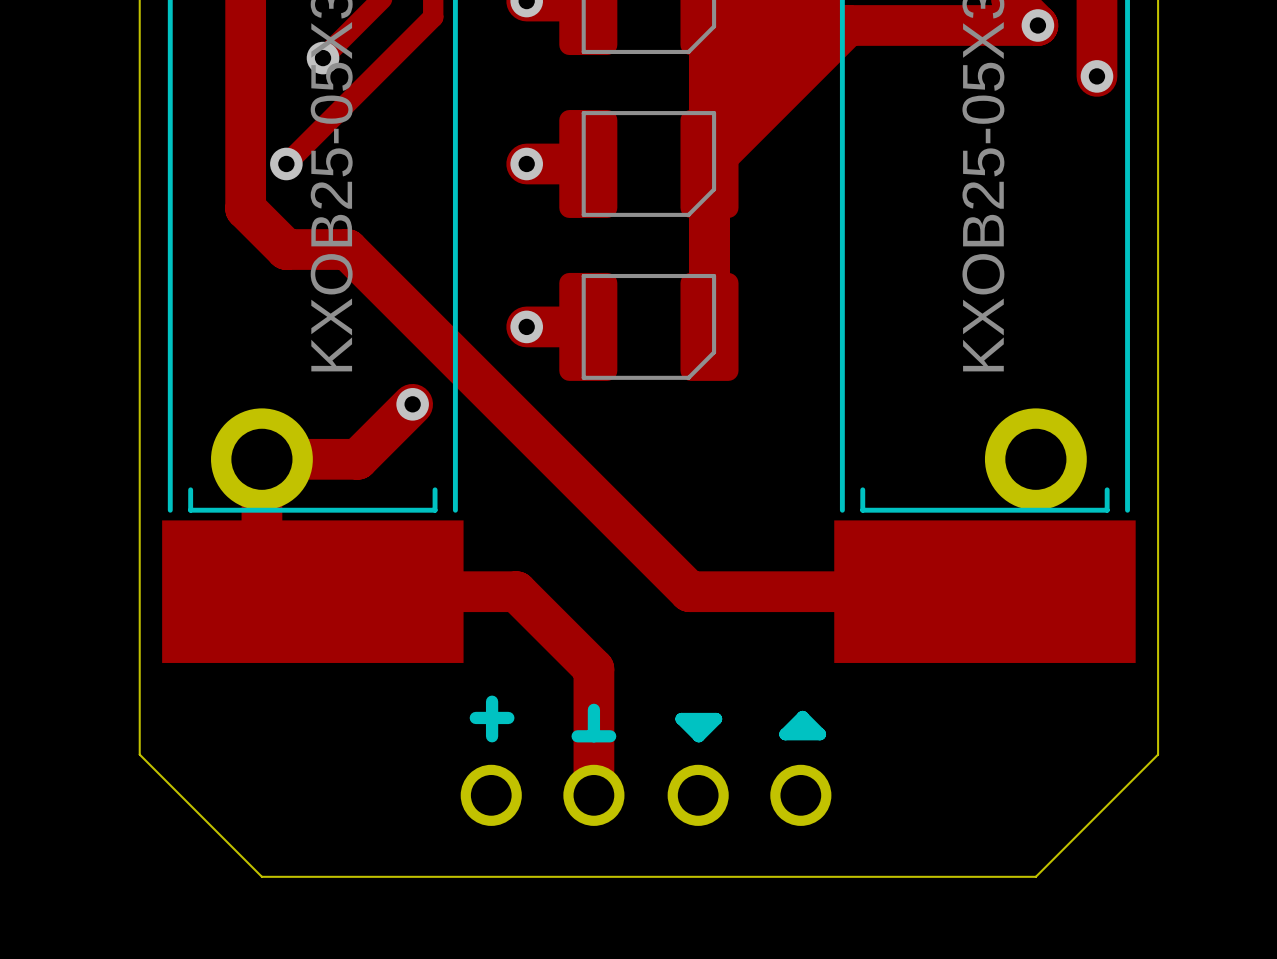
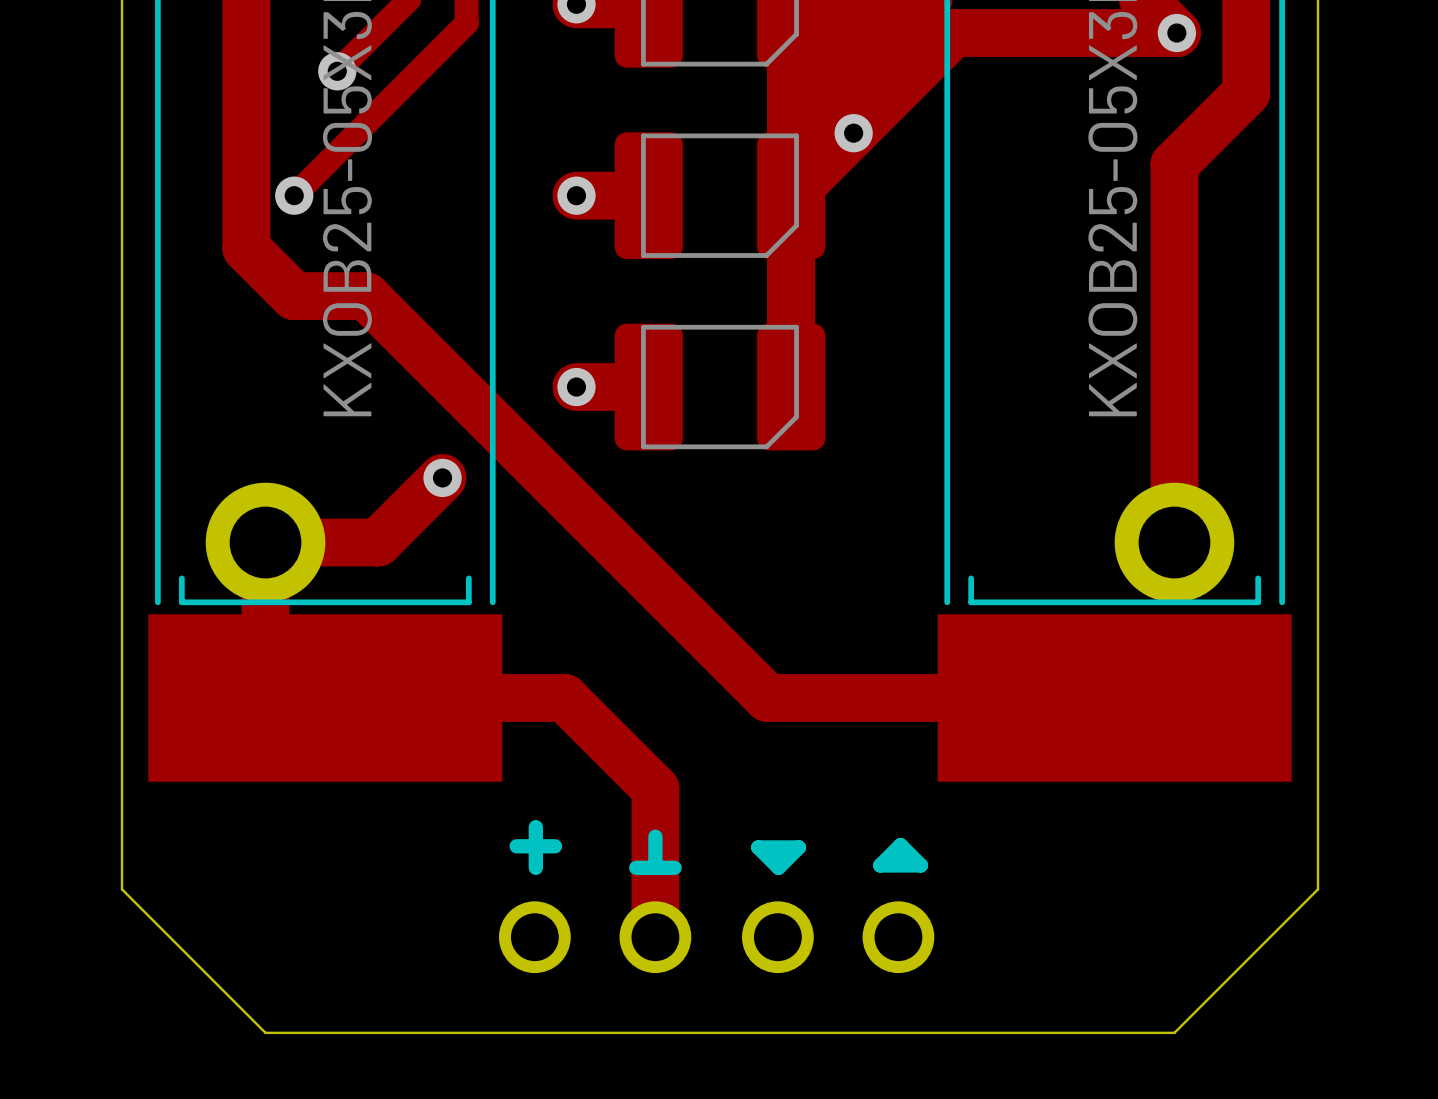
track: none -> (1246, 92) (1174, 164) (1174, 542)
via: (1096, 76) -> none
via: none -> (853, 133)

